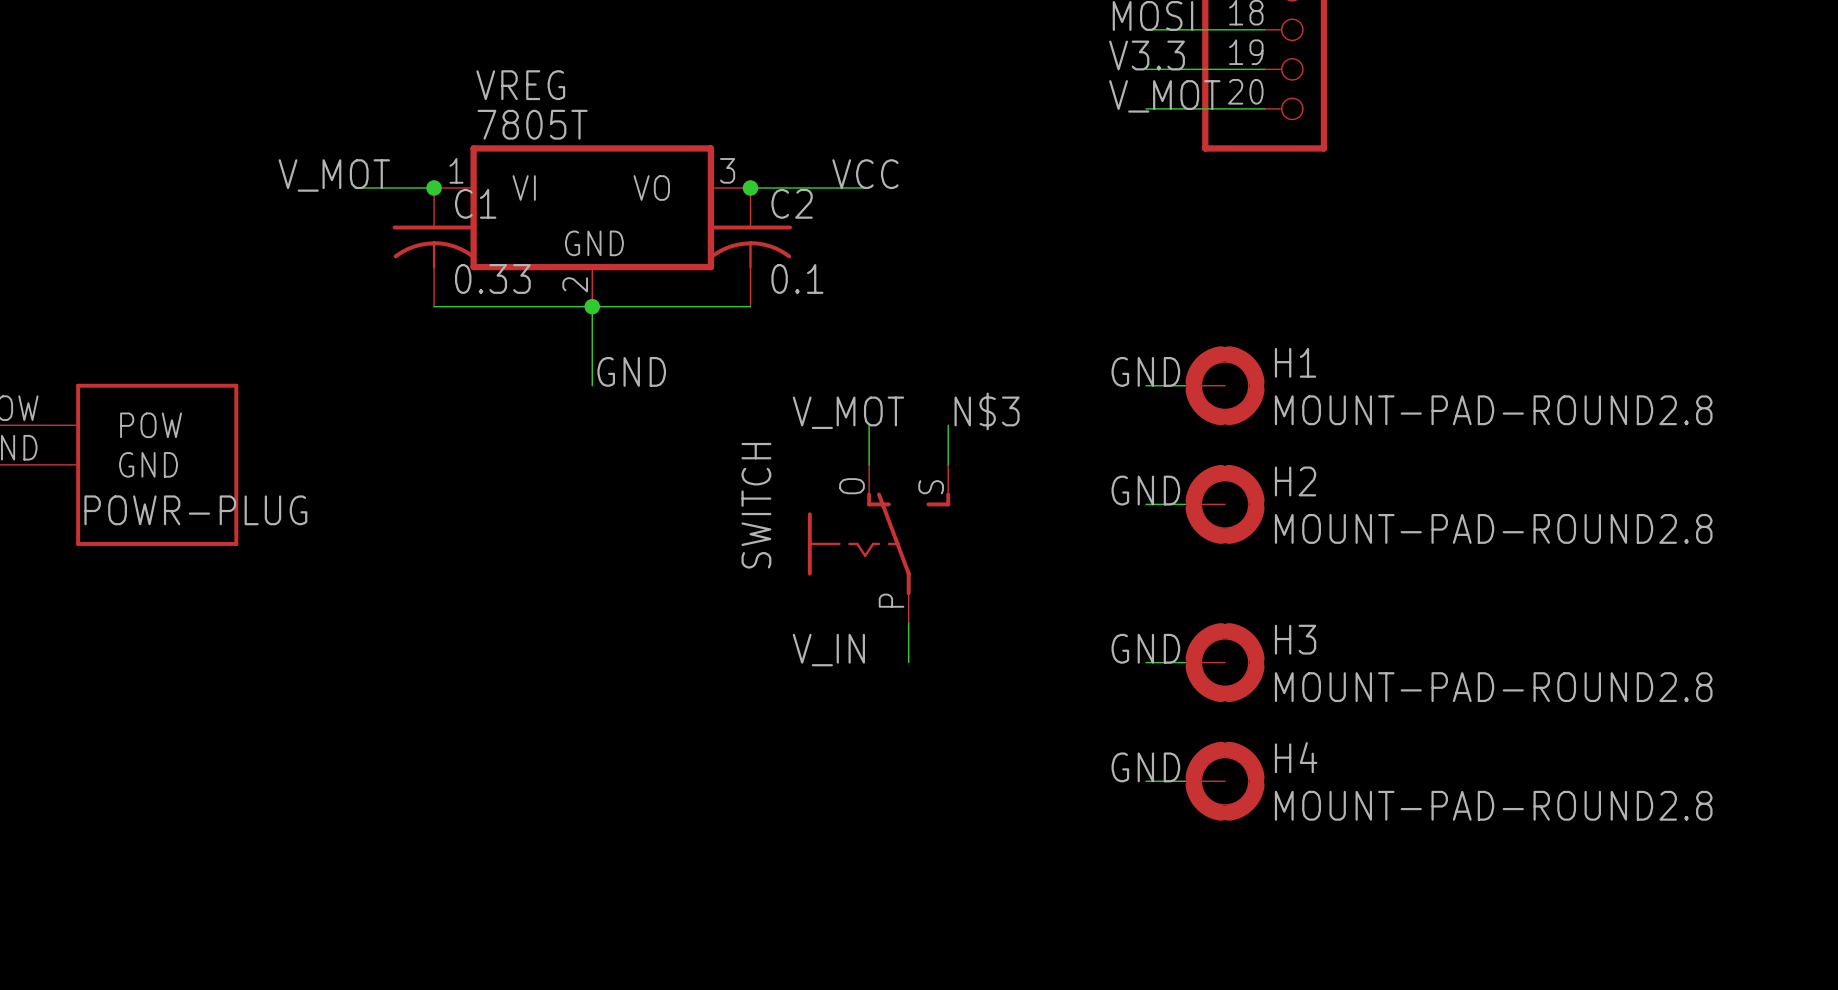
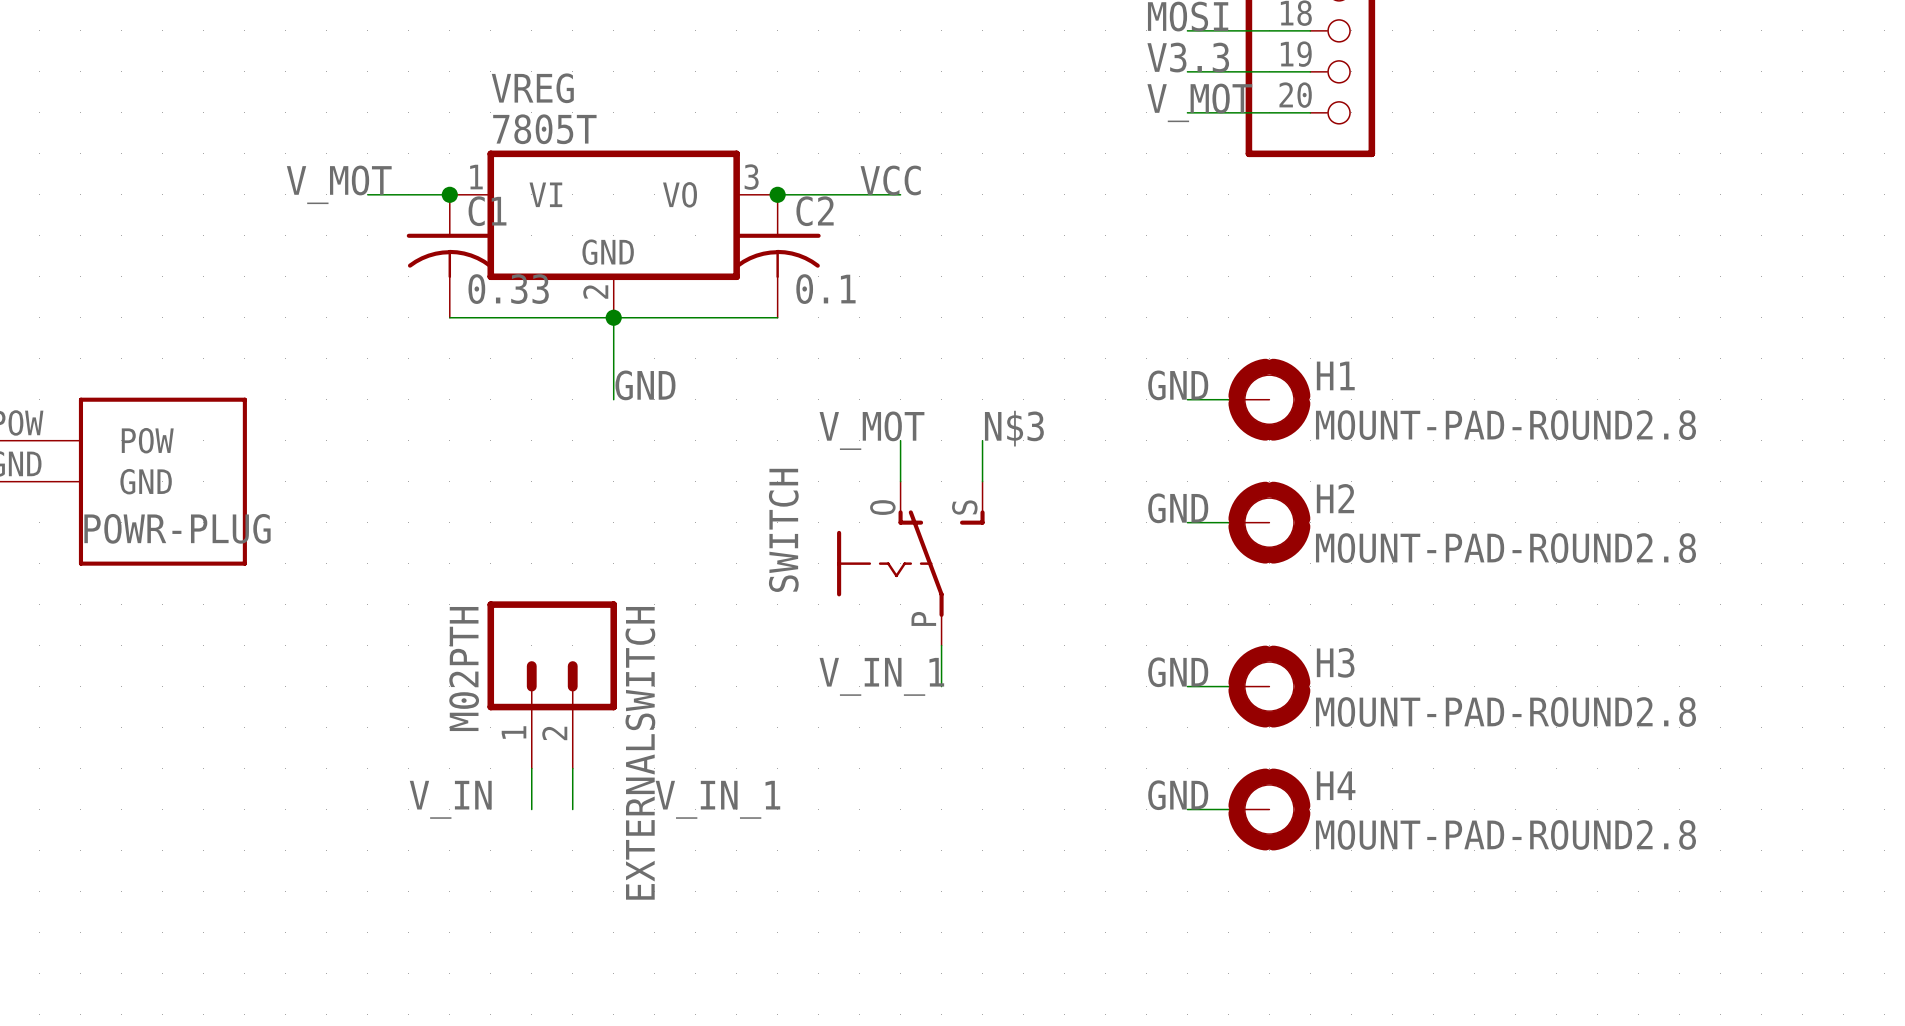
label: V_IN (828, 650) -> V_IN_1 (881, 676)
EXTERNALSWITCH: none -> M02PTH (552, 684)
wire: none -> (531, 768) (531, 809)
wire: none -> (572, 768) (572, 809)
label: none -> V_IN (450, 799)
label: none -> V_IN_1 (717, 799)

